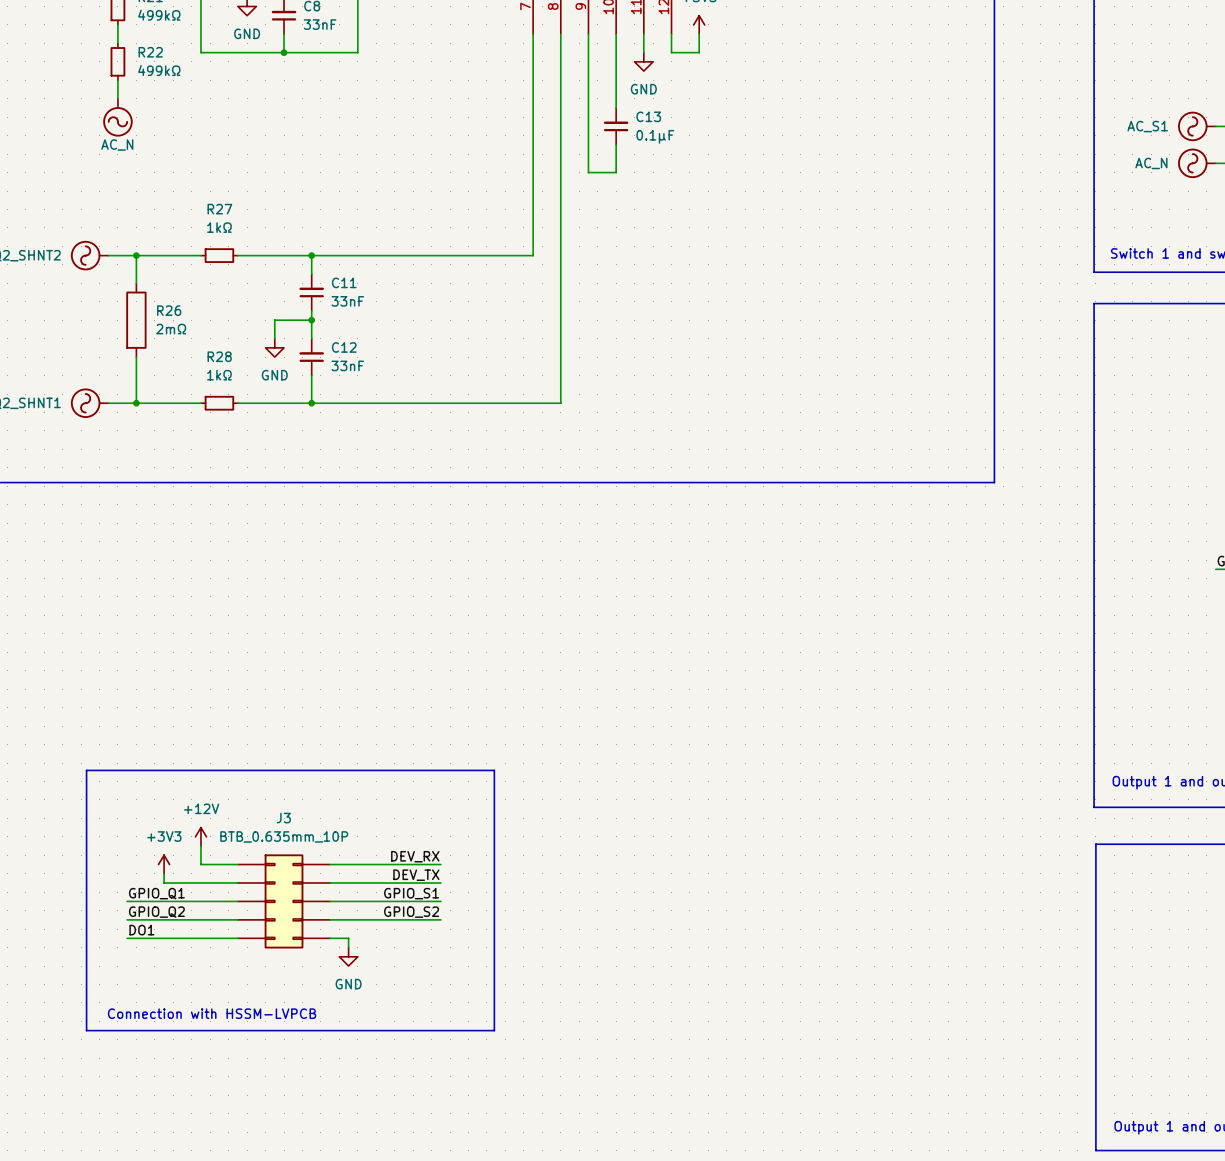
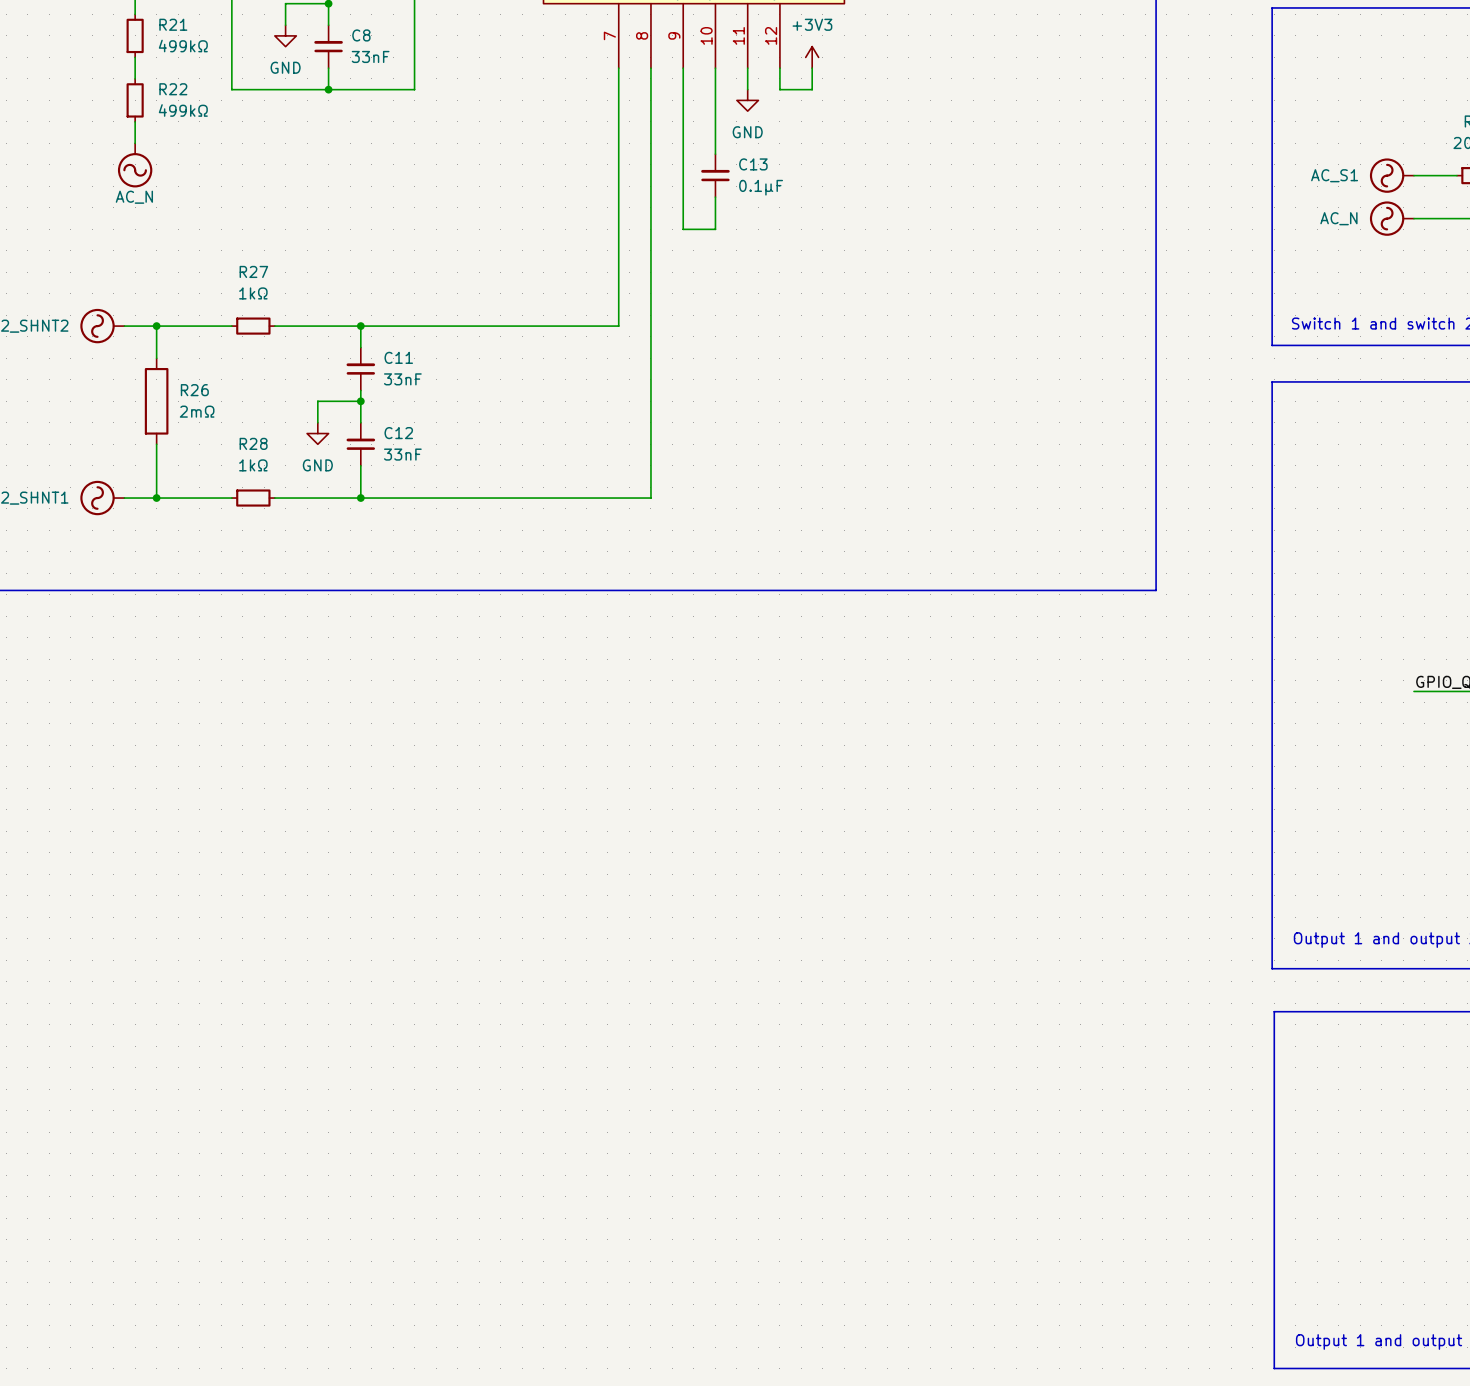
line: (86, 770) (494, 770) (494, 1030) (86, 1030) (86, 770) -> none
power symbol: +12V (200, 836) -> none
wire: (200, 846) (200, 864) (237, 864) -> none
label: DEV_RX (415, 856) -> none
power symbol: +3V3 (164, 864) -> none
wire: (330, 864) (440, 864) -> none
wire: (164, 873) (164, 882) (237, 882) -> none
label: DEV_TX (416, 875) -> none
wire: (330, 882) (440, 882) -> none
label: GPIO_Q1 (156, 893) -> none
label: GPIO_S1 (411, 893) -> none
wire: (127, 901) (237, 901) -> none
J3: (284, 901) -> none
wire: (330, 901) (440, 901) -> none
label: GPIO_Q2 (156, 912) -> none
label: GPIO_S2 (411, 912) -> none
wire: (127, 919) (237, 919) -> none
wire: (330, 919) (440, 919) -> none
label: DO1 (141, 930) -> none
wire: (127, 938) (237, 938) -> none
wire: (330, 938) (348, 938) (348, 947) -> none
power symbol: GND (348, 956) -> none
text: Connection with HSSM-LVPCB (212, 1013) -> none

